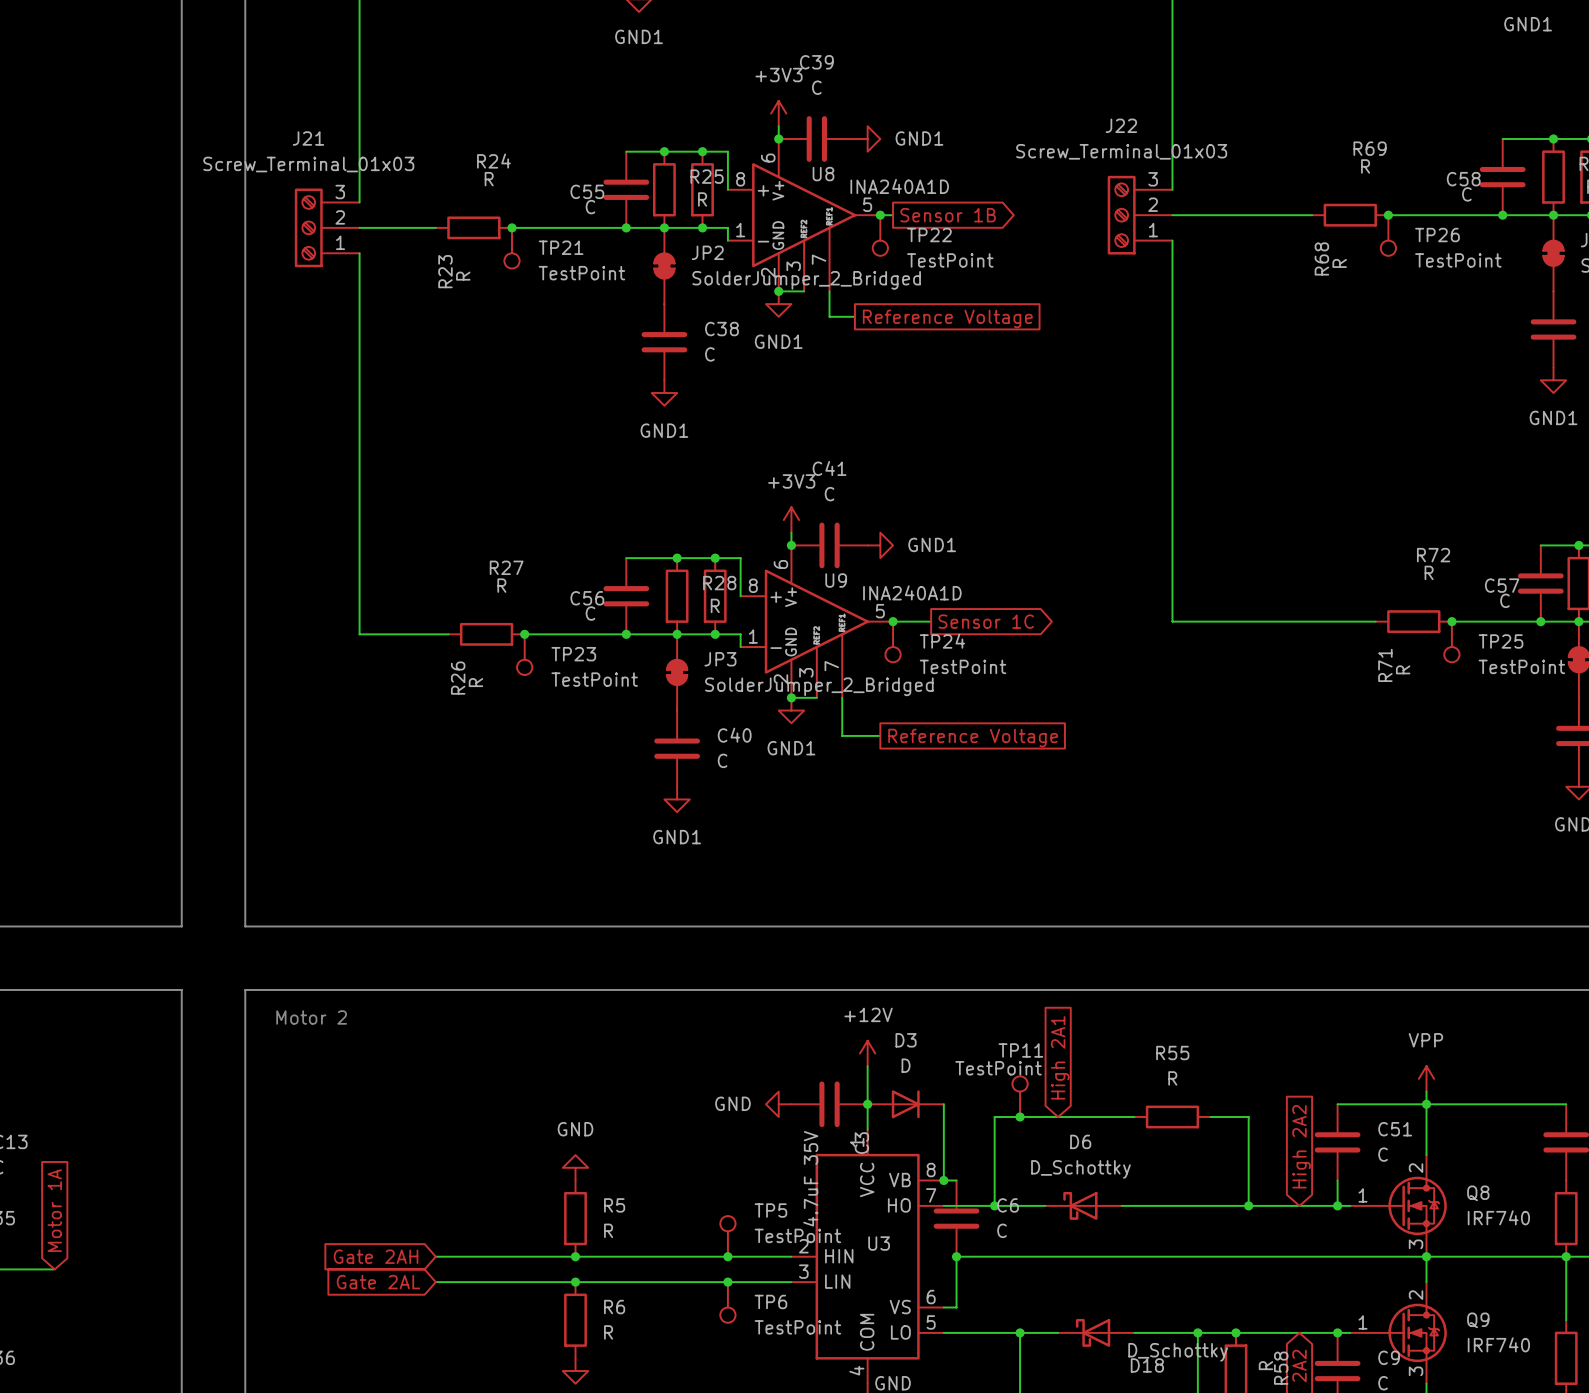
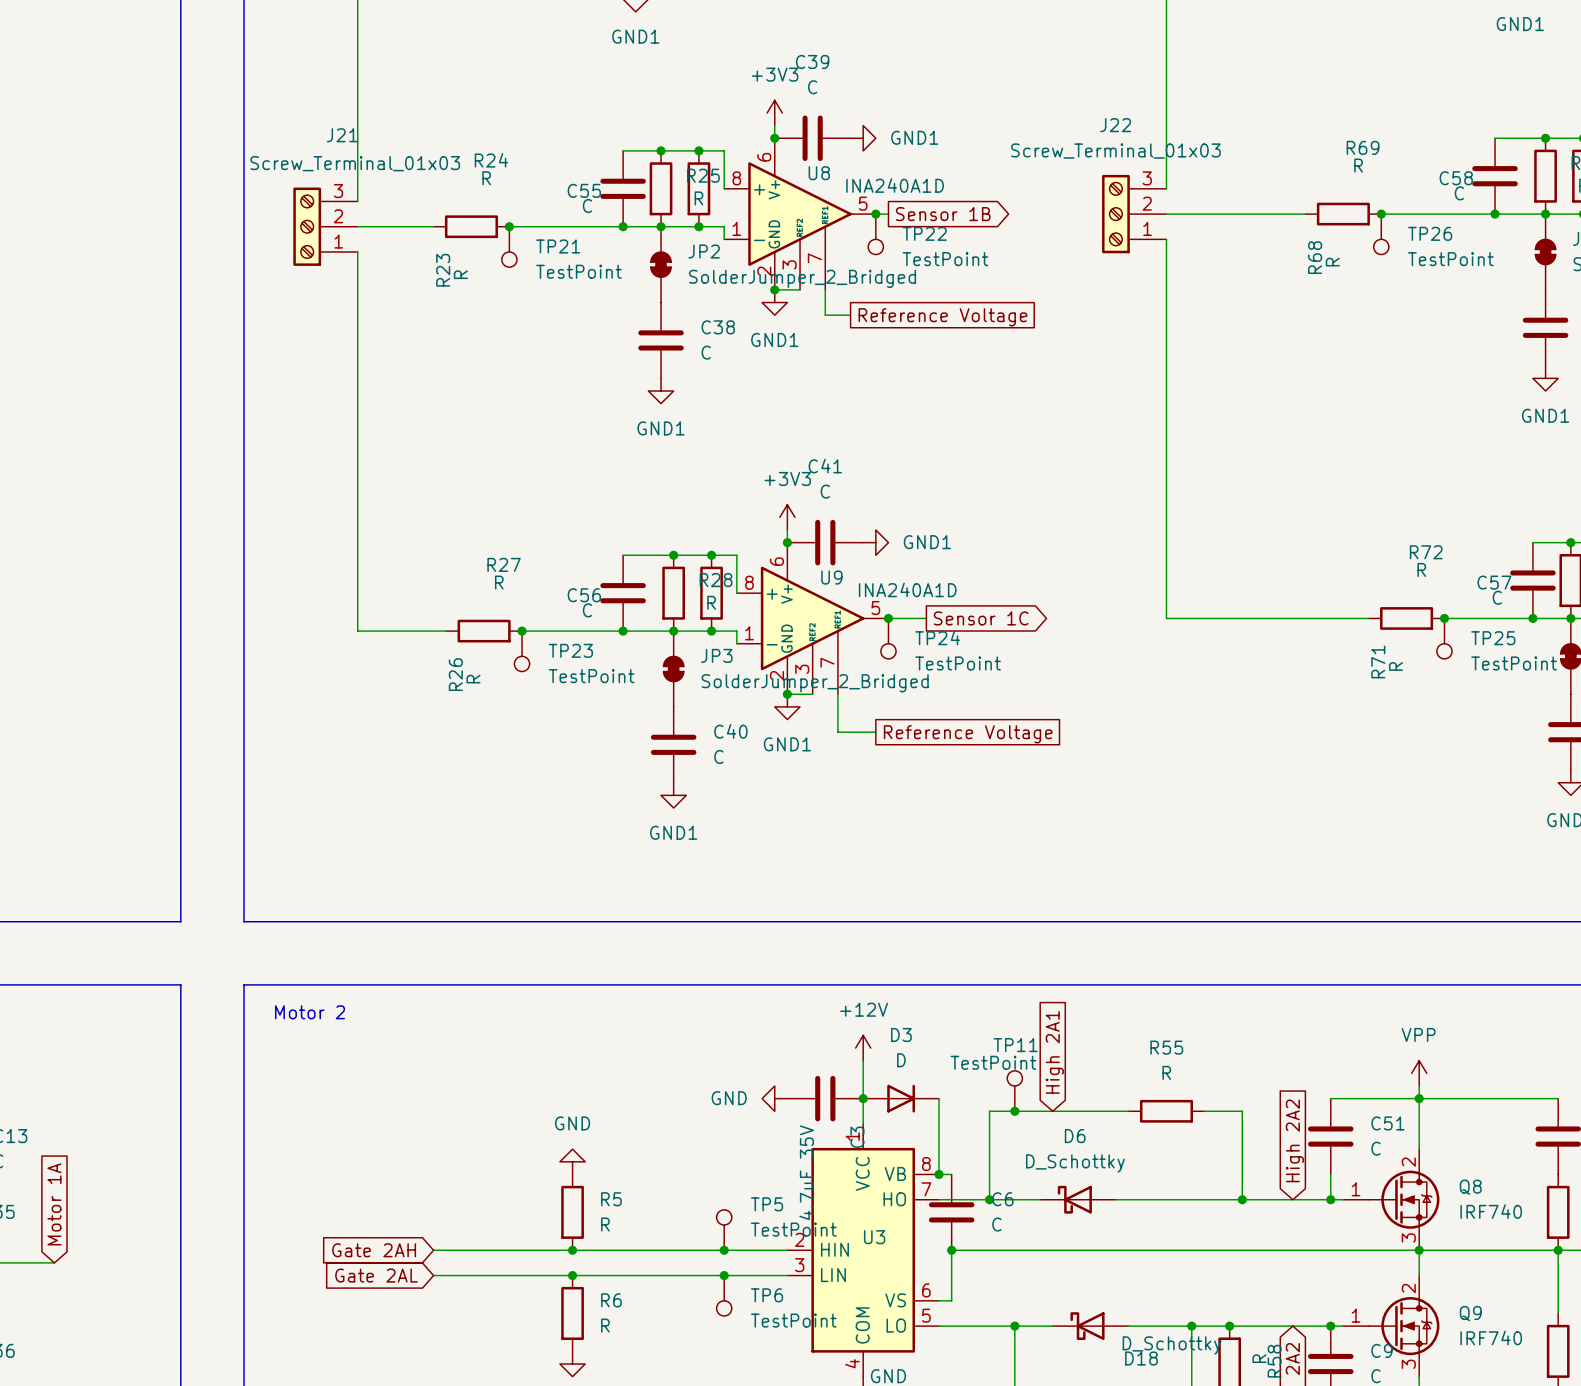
J21 name position: J21 (308, 138) -> J21 (342, 135)
J21 value position: Screw_Terminal_01x03 (308, 164) -> Screw_Terminal_01x03 (355, 163)

